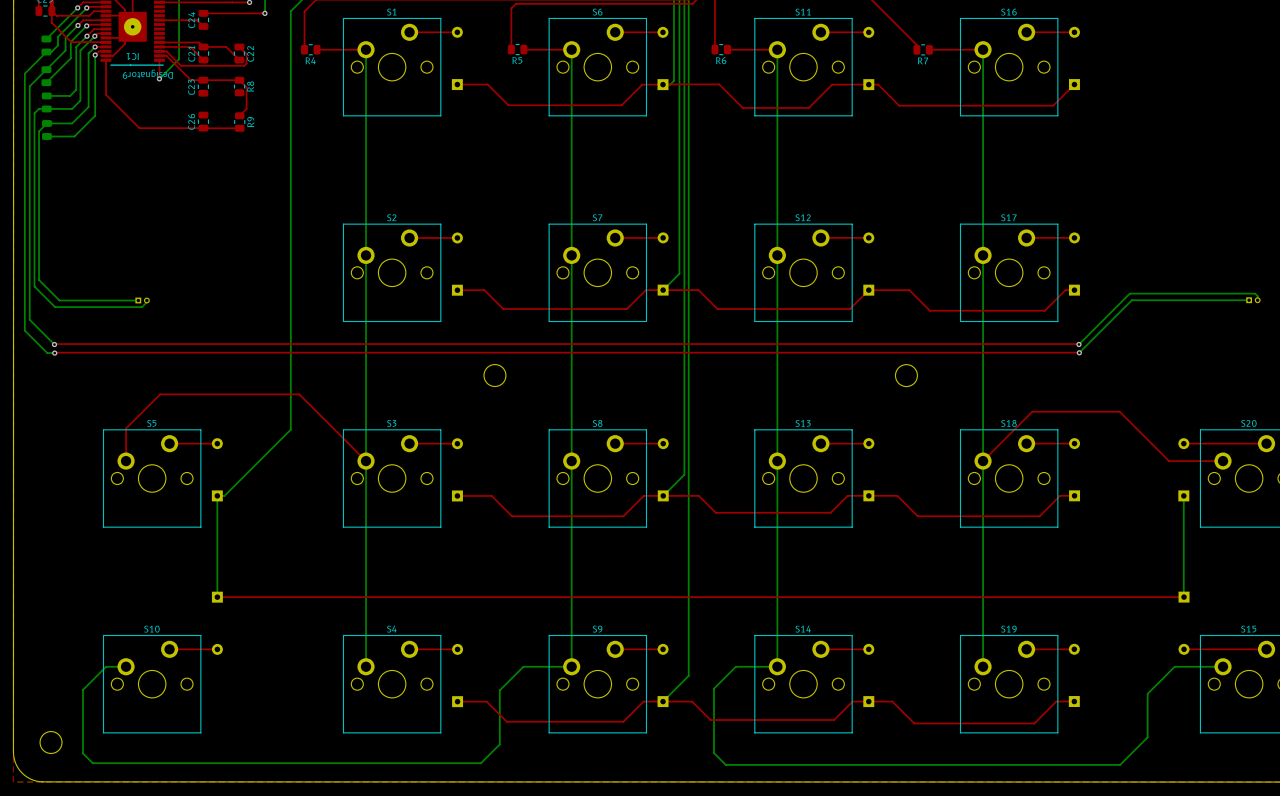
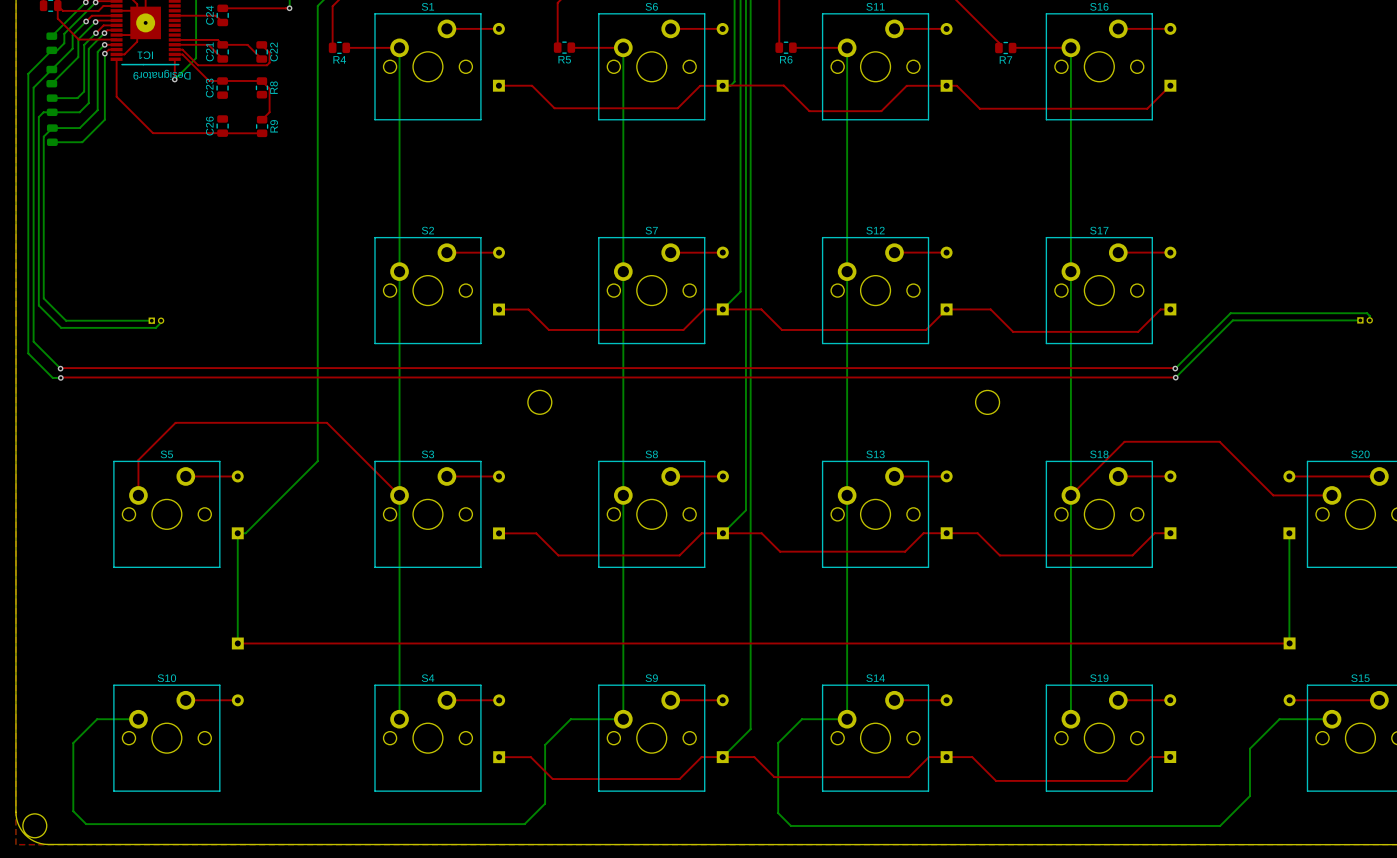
bottom track: (106, 666) (83, 689) (83, 753) (92, 763) -> (116, 719) (97, 719) (73, 743) (73, 811) (86, 824) (102, 824)
round board edge position: (51, 742) -> (34, 825)

